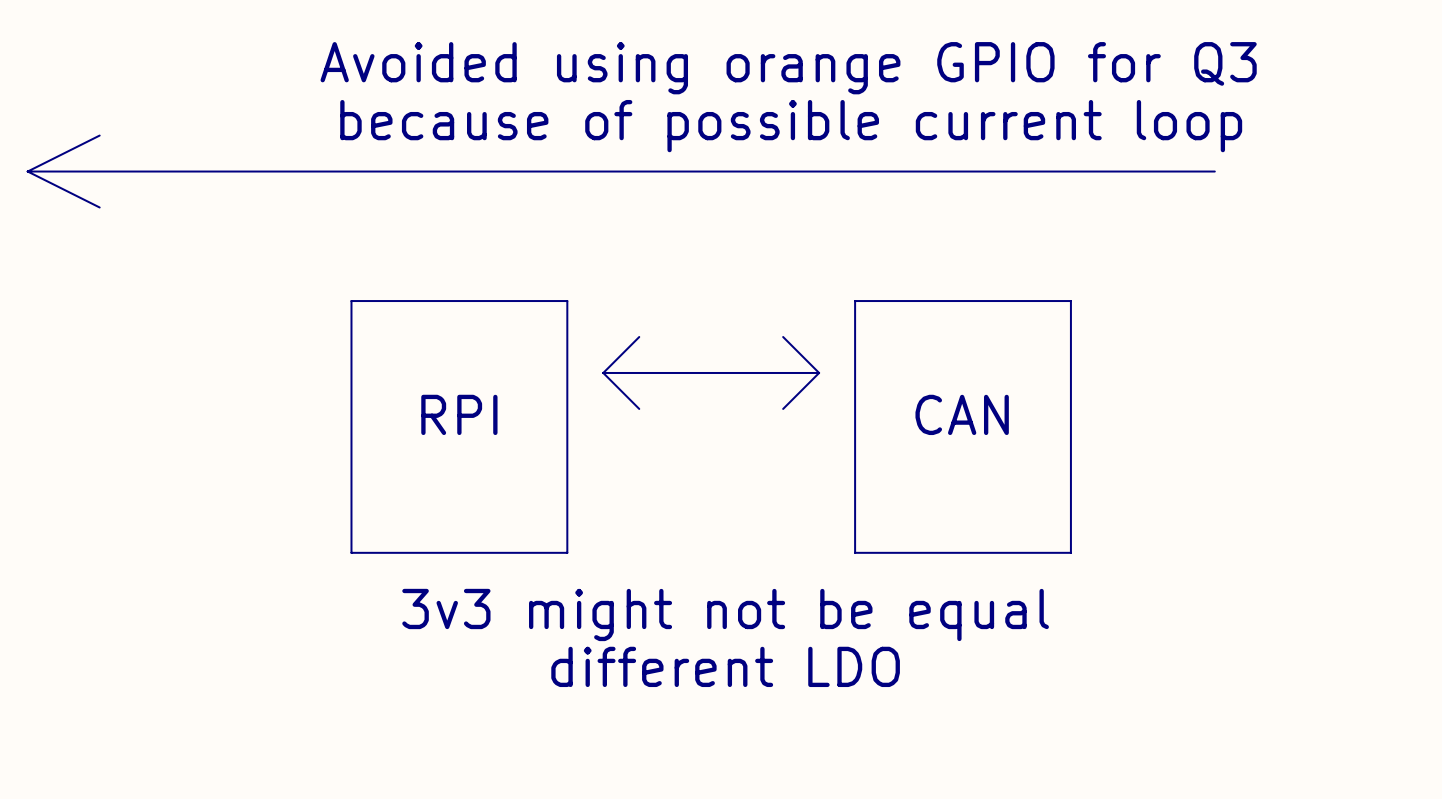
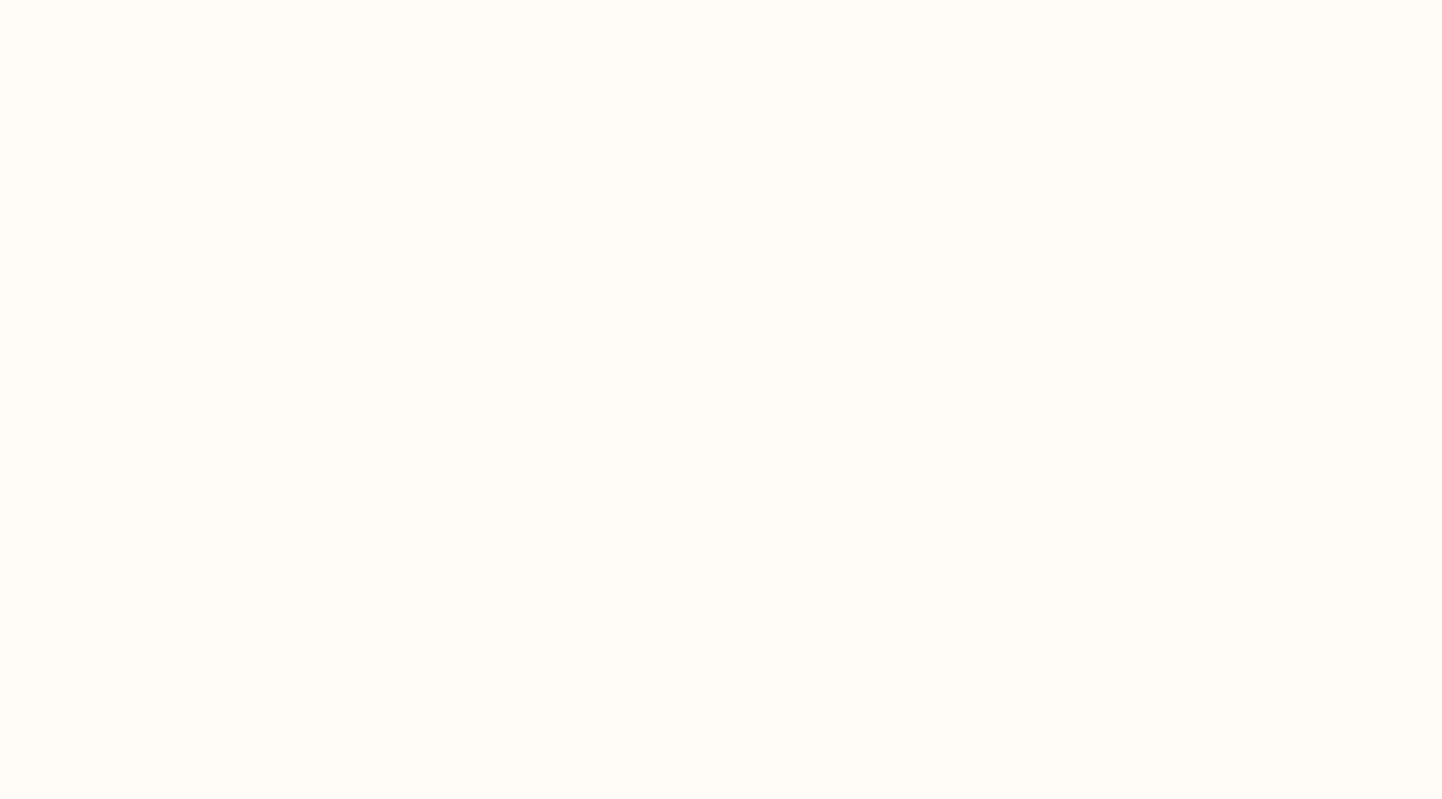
text: Avoided using orange GPIO for Q3 (788, 68) -> none
text: because of possible current loop (791, 126) -> none
line: (99, 135) (27, 171) -> none
line: (27, 171) (99, 207) -> none
line: (27, 171) (1214, 171) -> none
line: (351, 301) (567, 301) (567, 552) (351, 552) (351, 301) -> none
line: (855, 301) (1070, 301) (1070, 552) (855, 552) (855, 301) -> none
line: (639, 337) (603, 372) -> none
line: (783, 337) (819, 372) -> none
line: (603, 372) (819, 372) -> none
line: (603, 372) (639, 408) -> none
line: (819, 372) (783, 408) -> none
text: RPI (459, 414) -> none
text: CAN (962, 414) -> none
text: 3v3 might not be equal (725, 614) -> none
text: different LDO (725, 666) -> none

